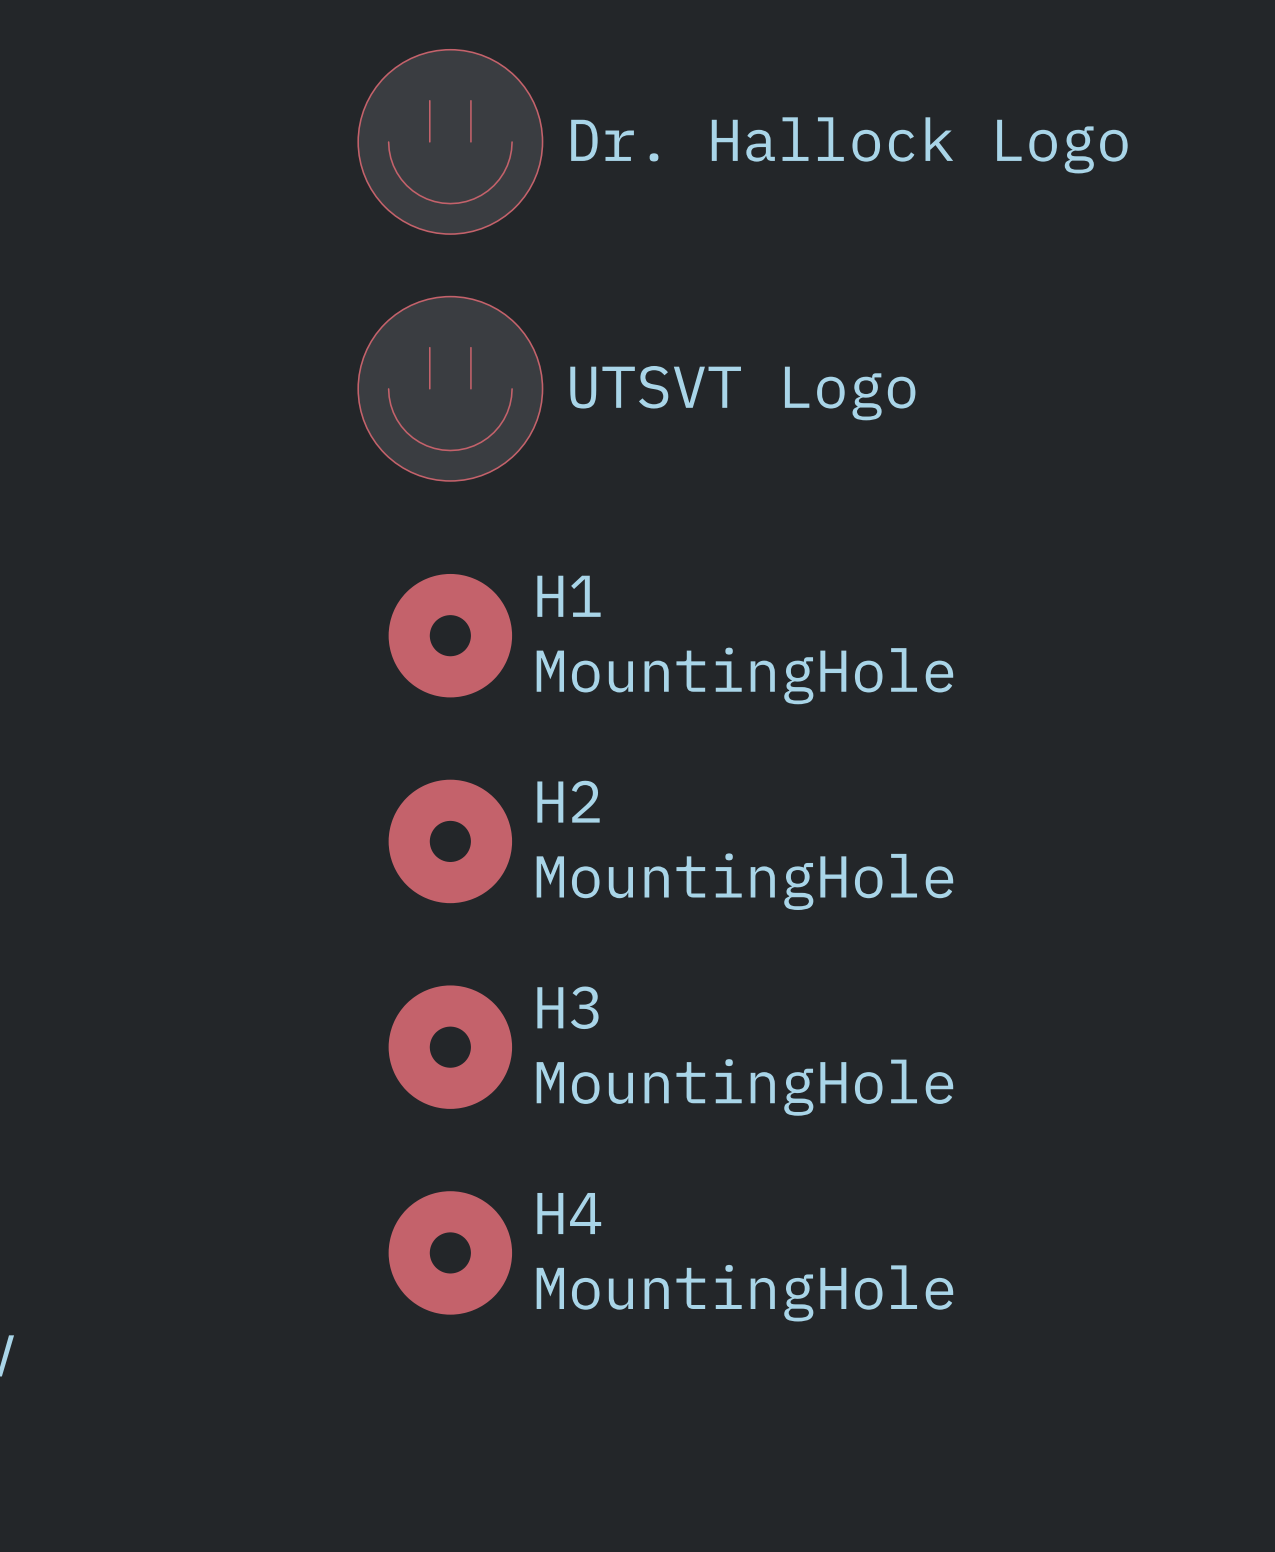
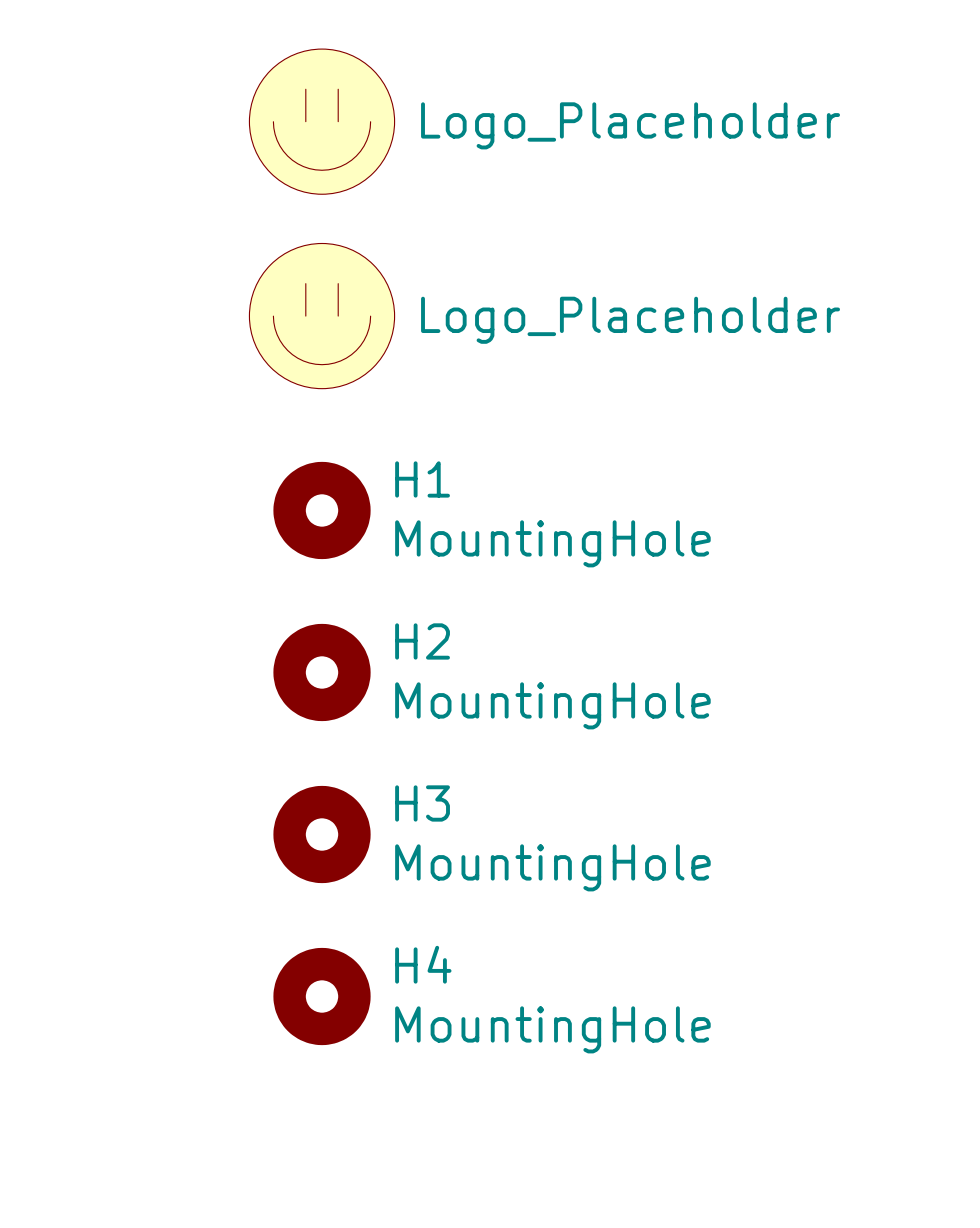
part value: Dr. Hallock Logo (849, 145) -> Logo_Placeholder (630, 125)
part value: UTSVT Logo (742, 393) -> Logo_Placeholder (630, 320)

